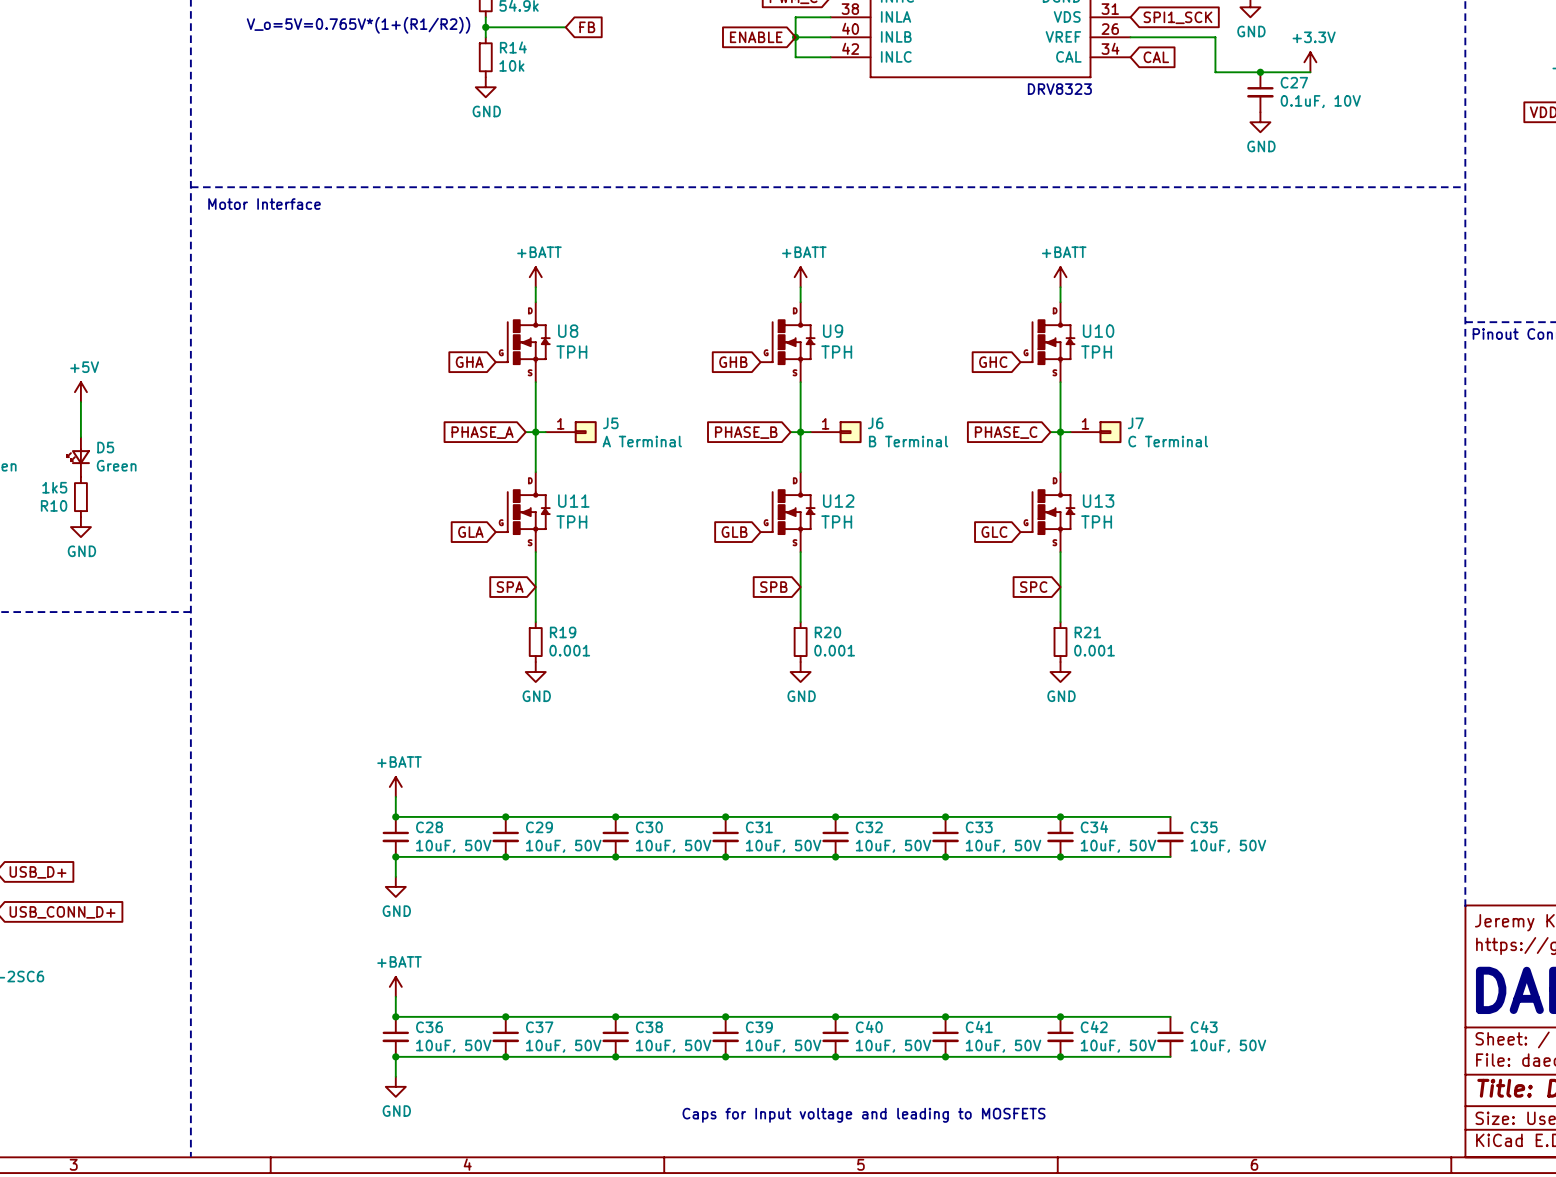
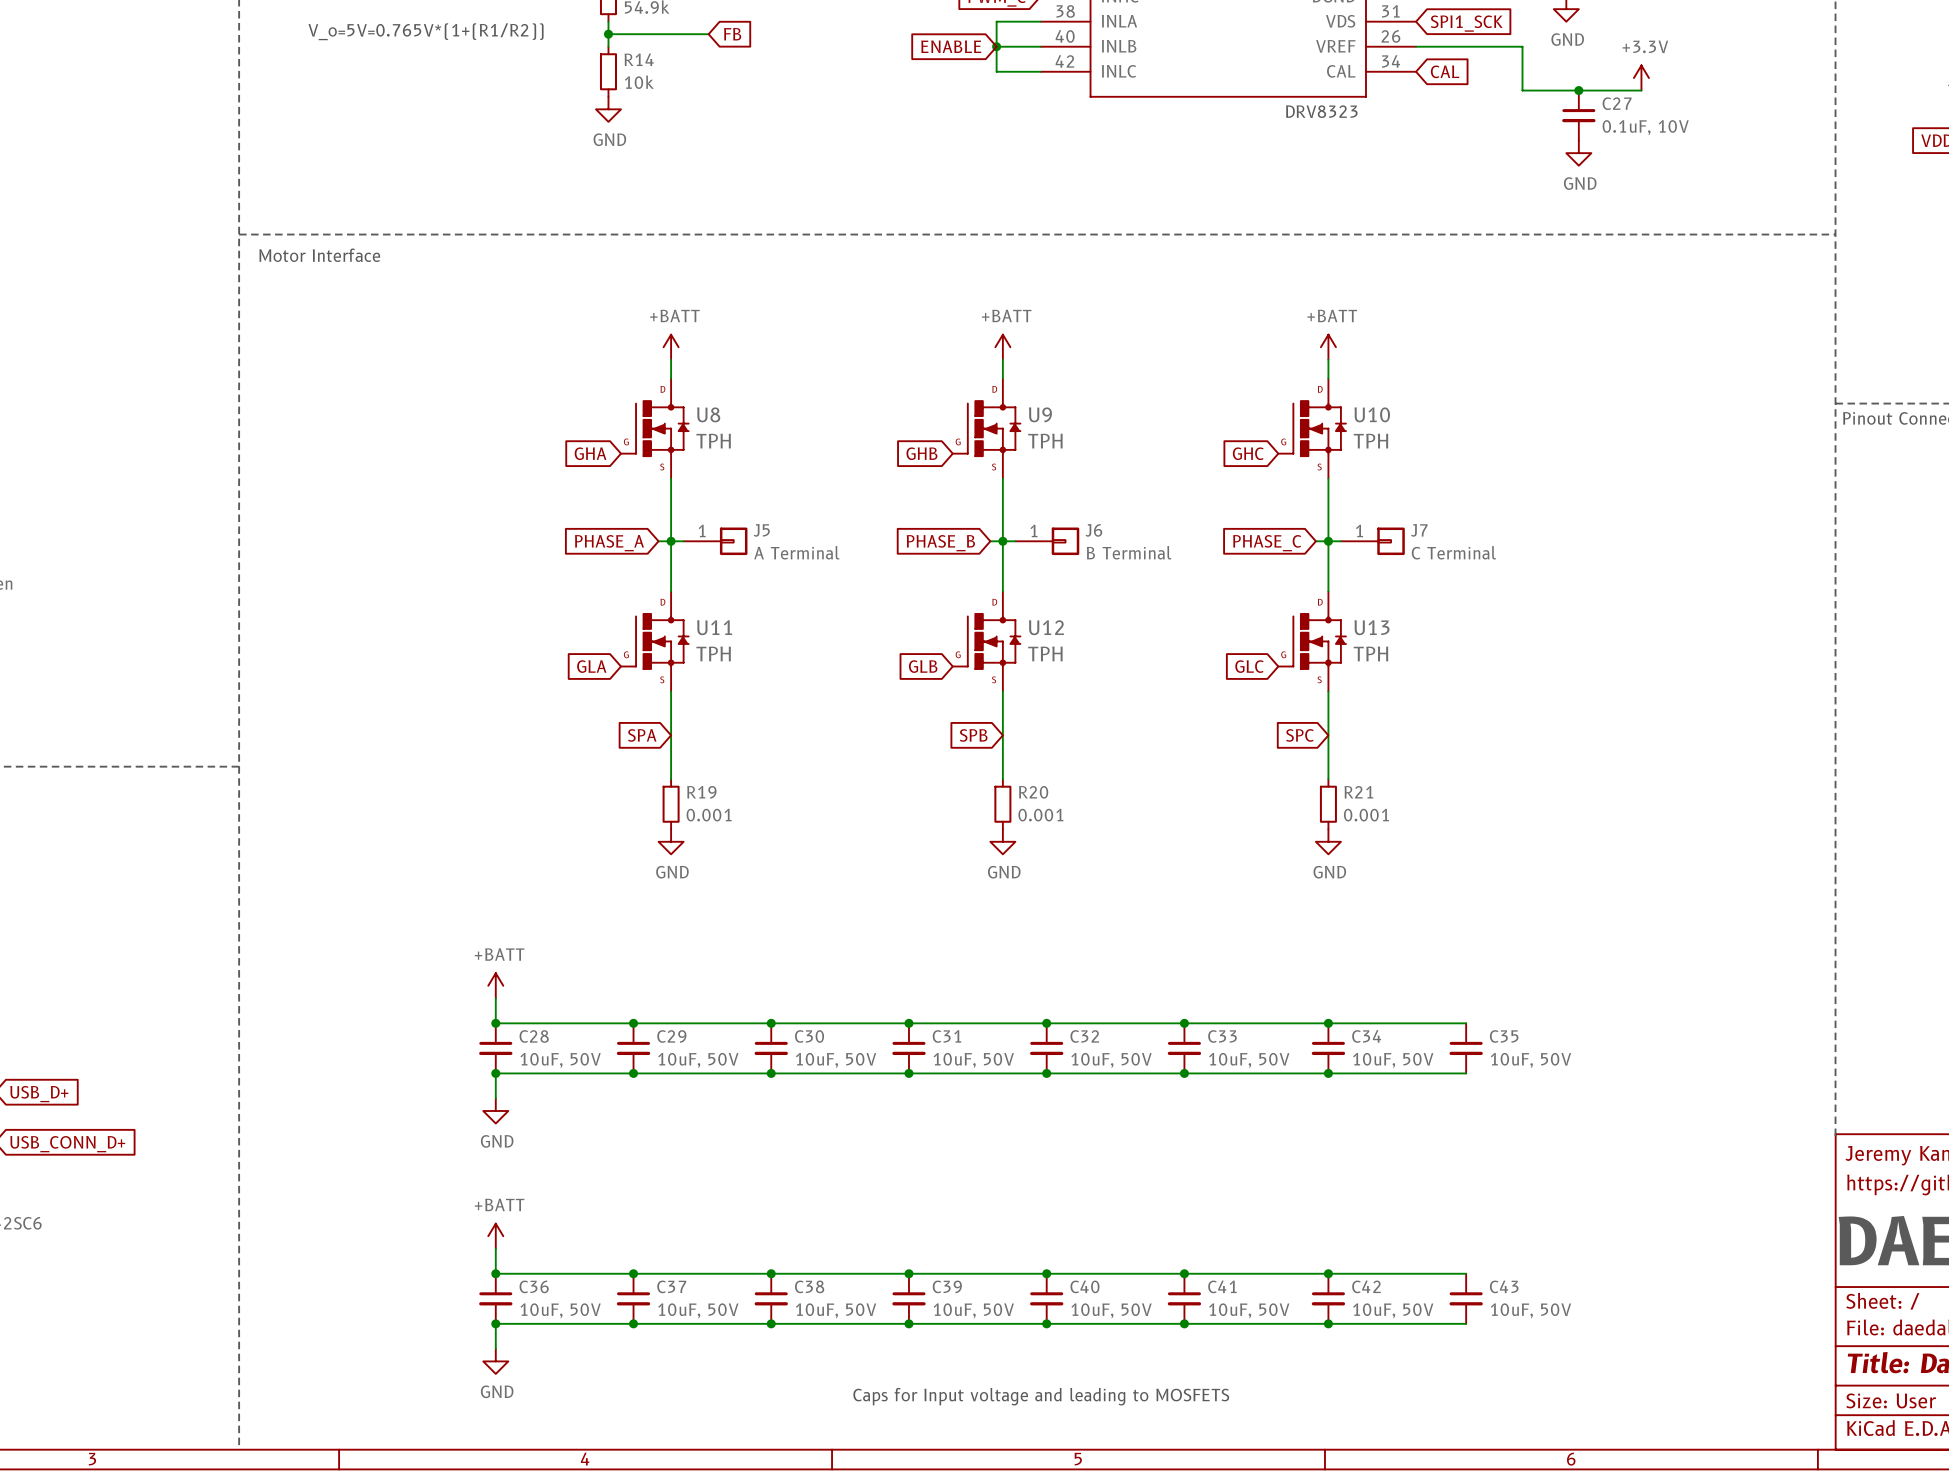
power symbol: +5V (80, 392) -> none
wire: (80, 402) (80, 437) -> none
D5: Green (78, 457) -> none
R10: 1k5 (80, 497) -> none
power symbol: GND (80, 527) -> none

